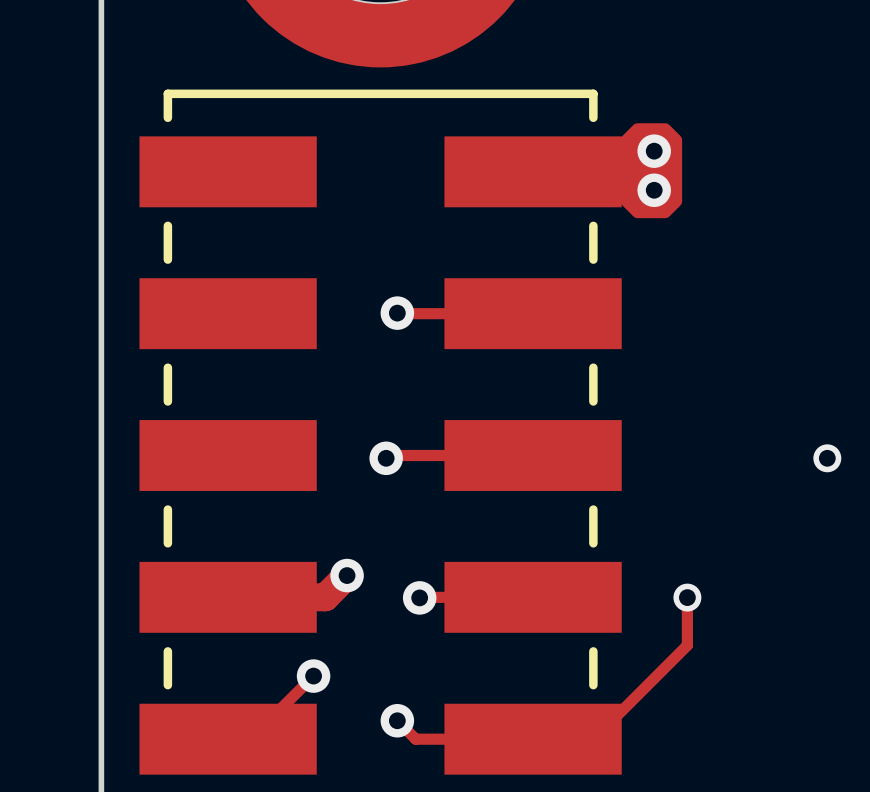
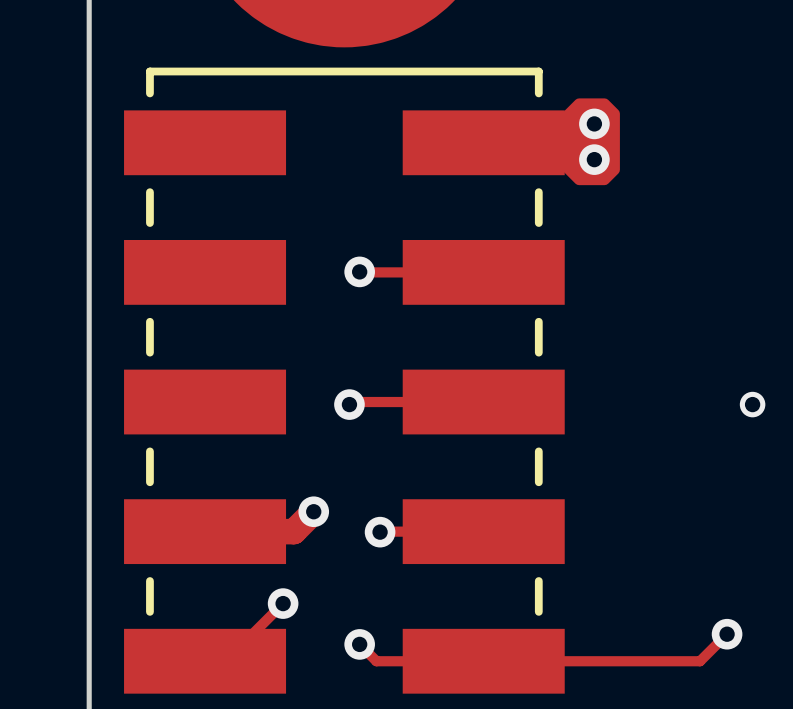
track: (687, 597) (687, 645) (593, 739) -> (727, 634) (700, 661) (539, 661)
via: (687, 597) -> none
via: none -> (727, 634)

